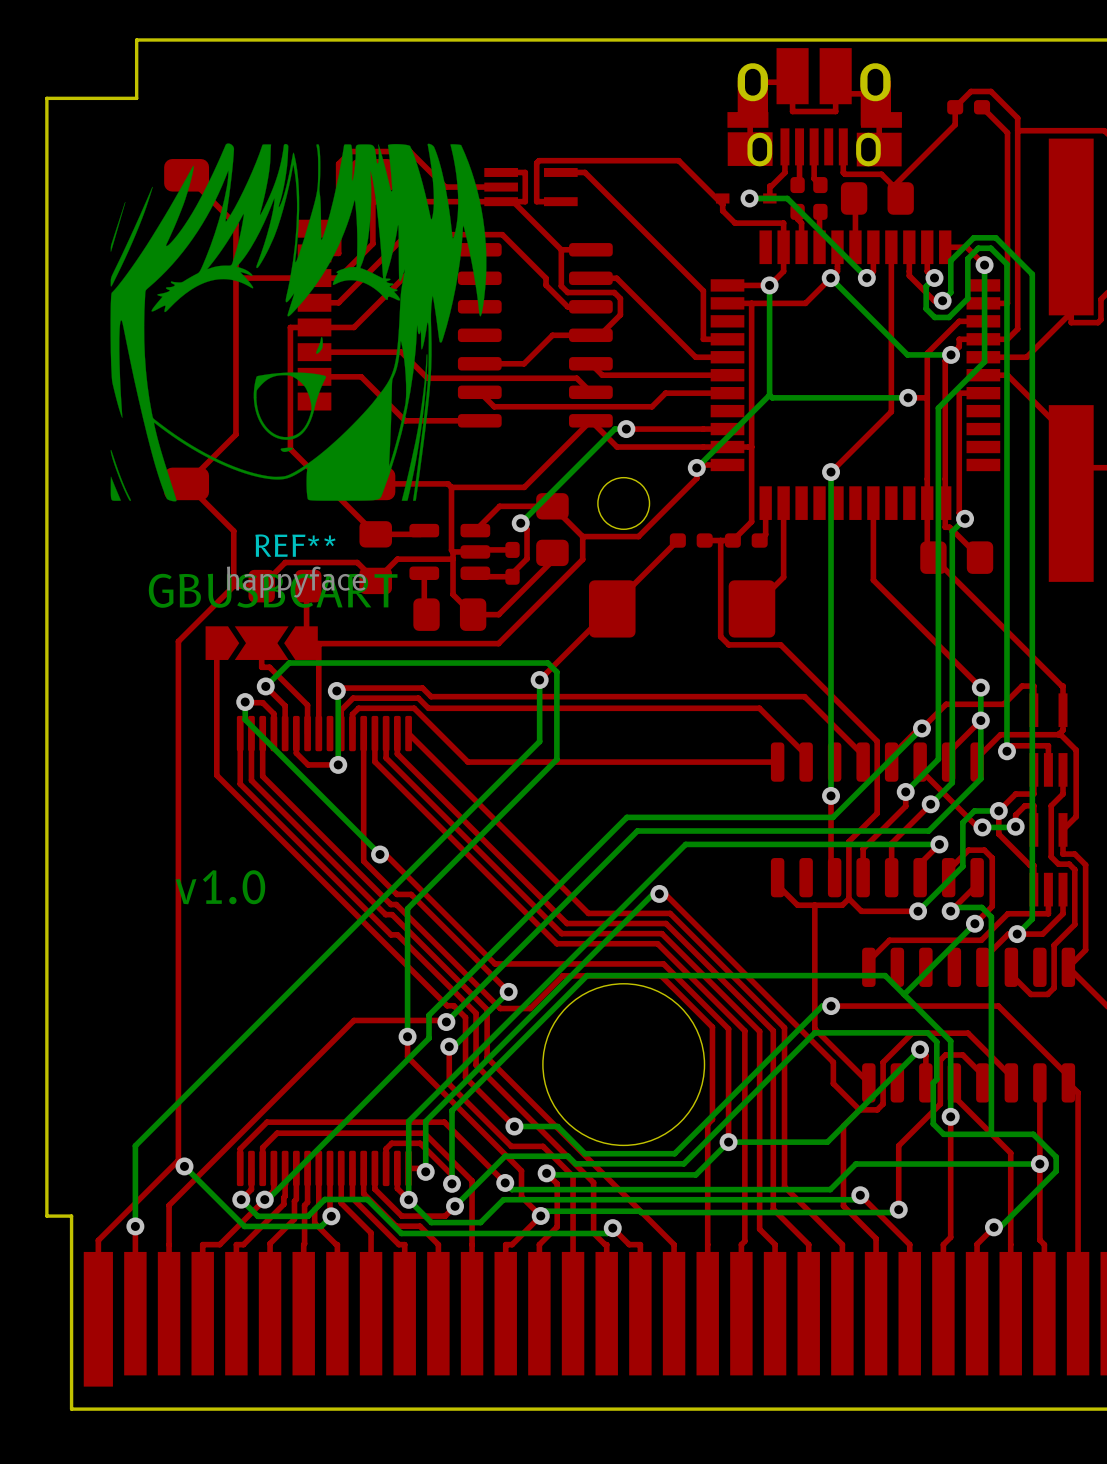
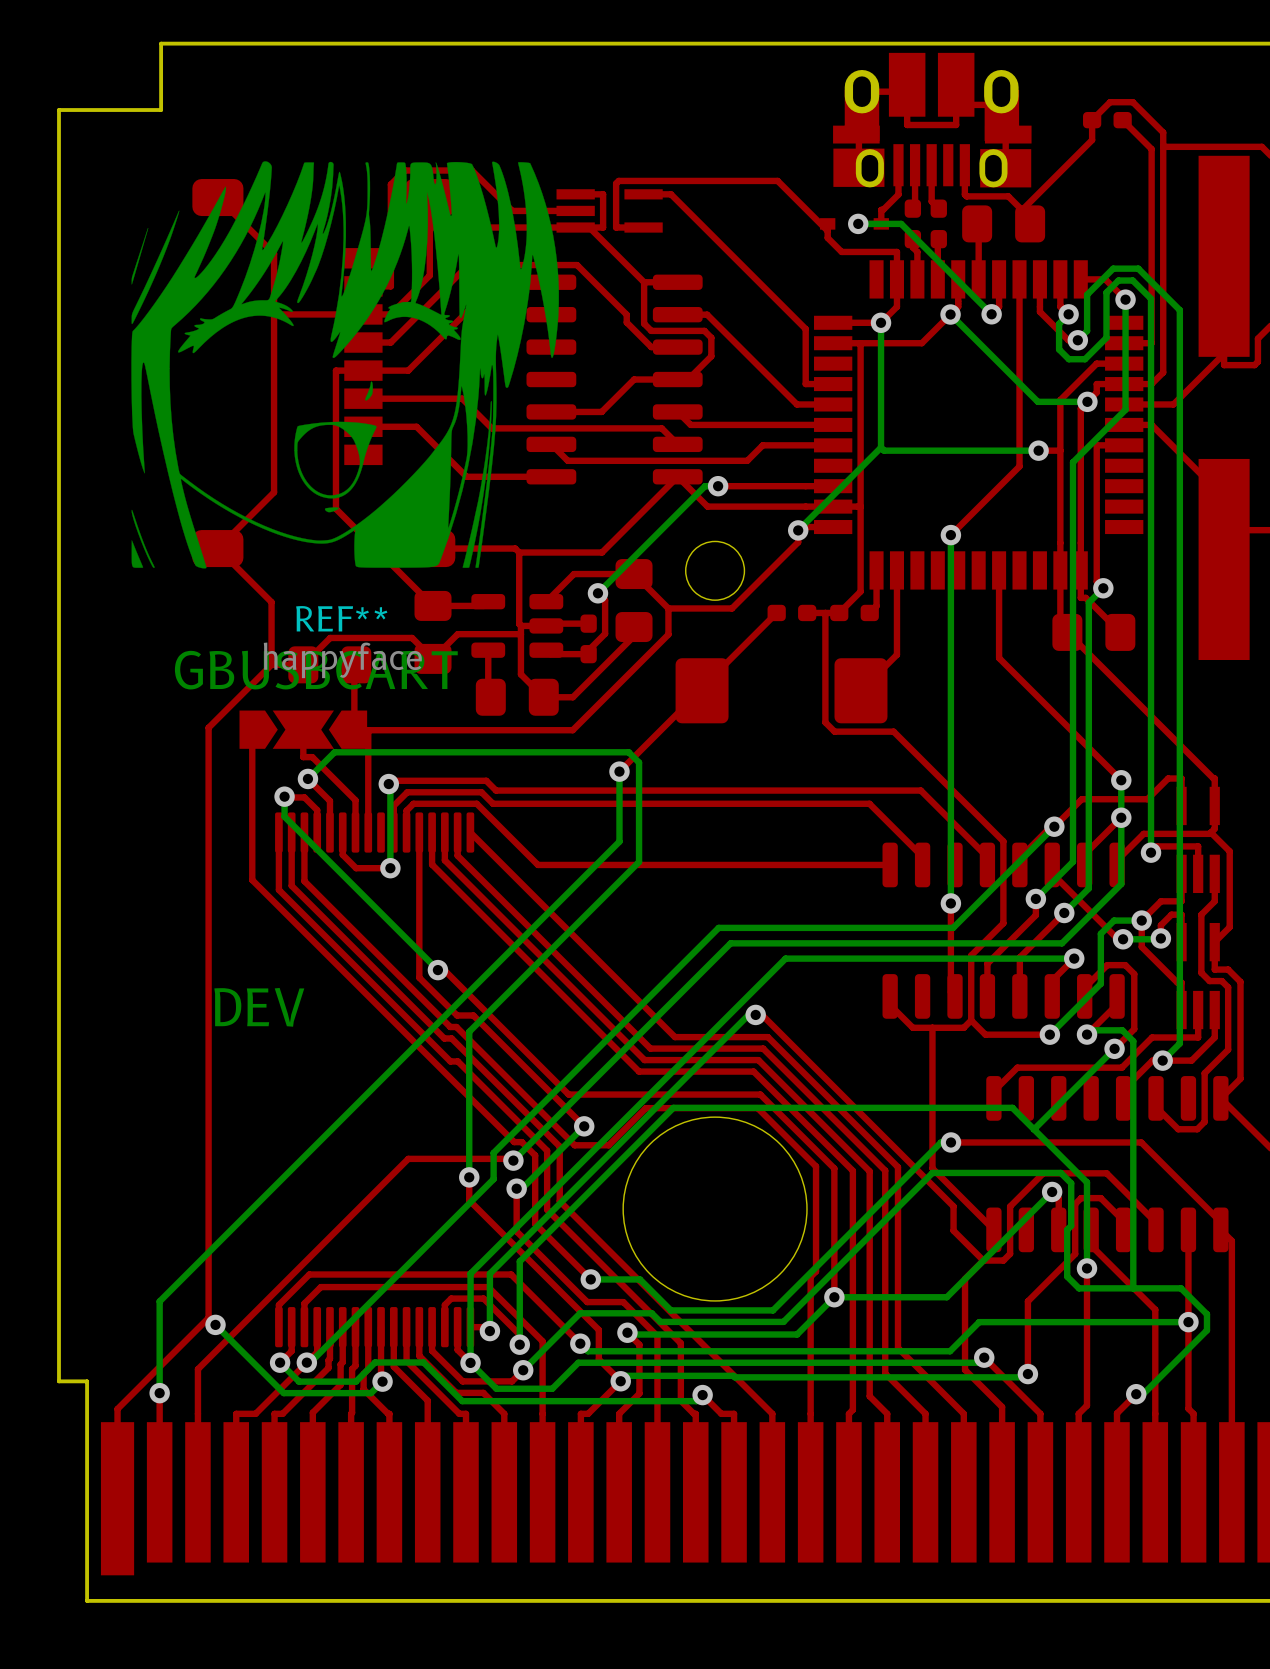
text: v1.0 (220, 887) -> DEV (259, 1007)

